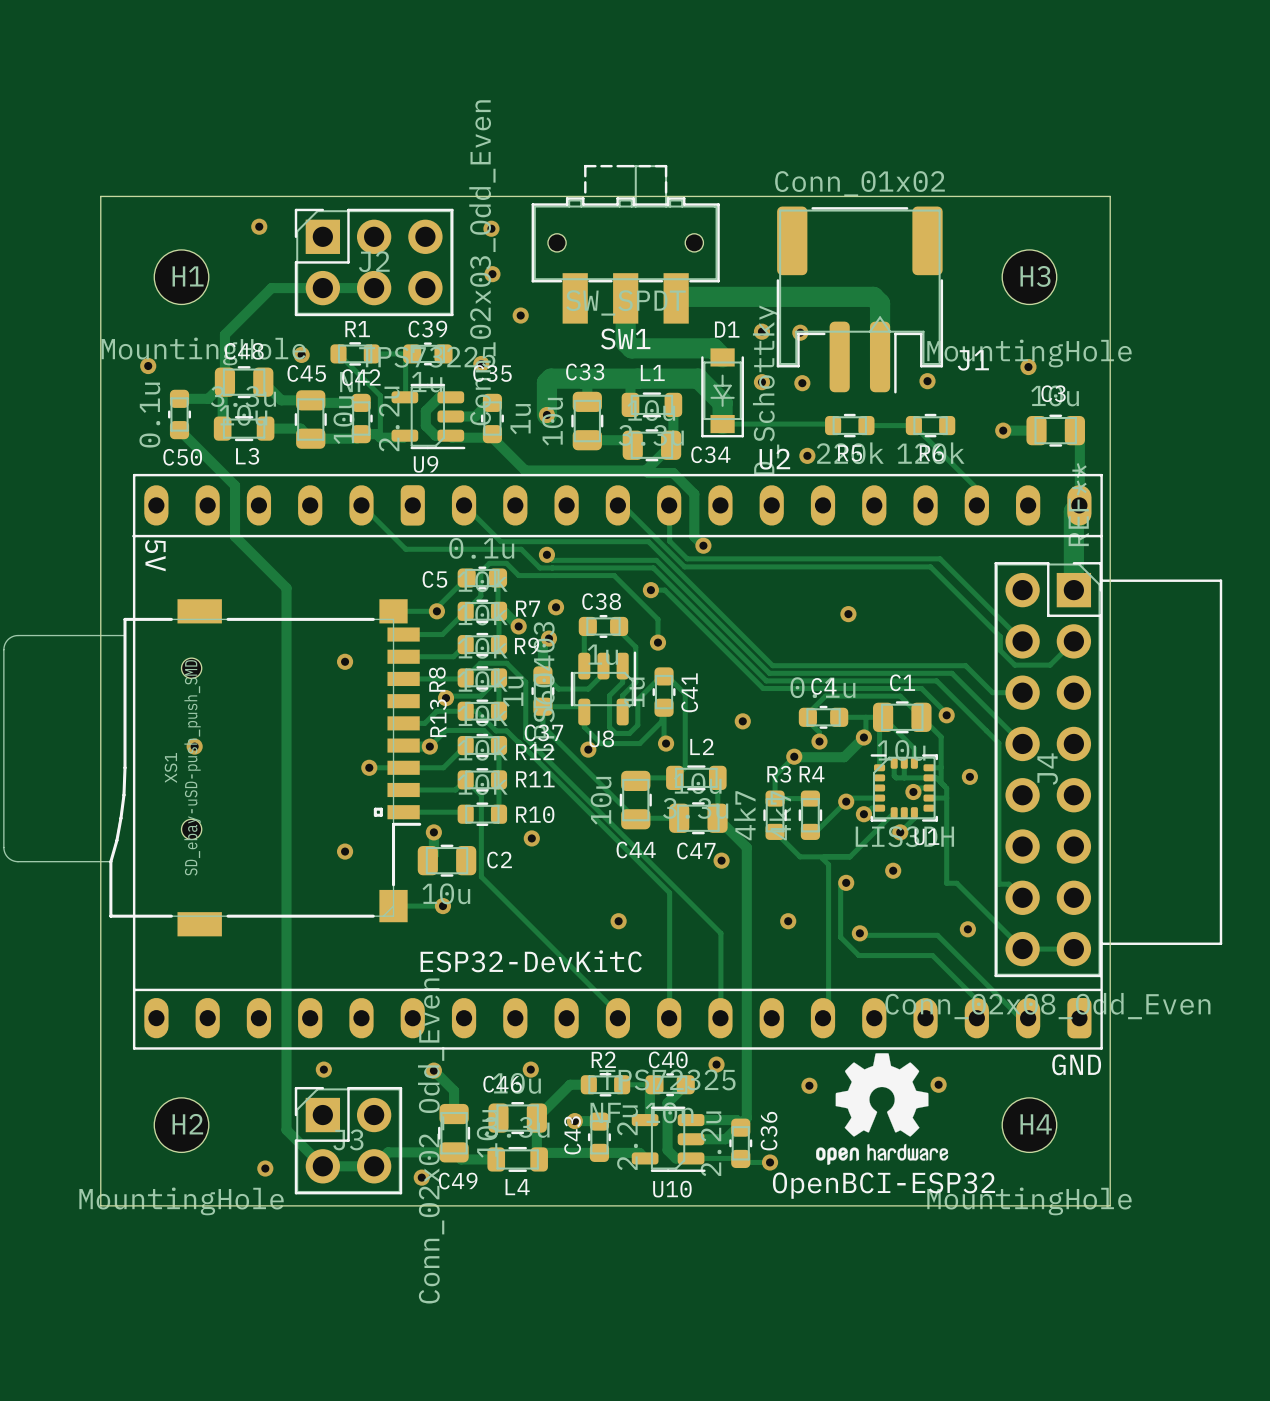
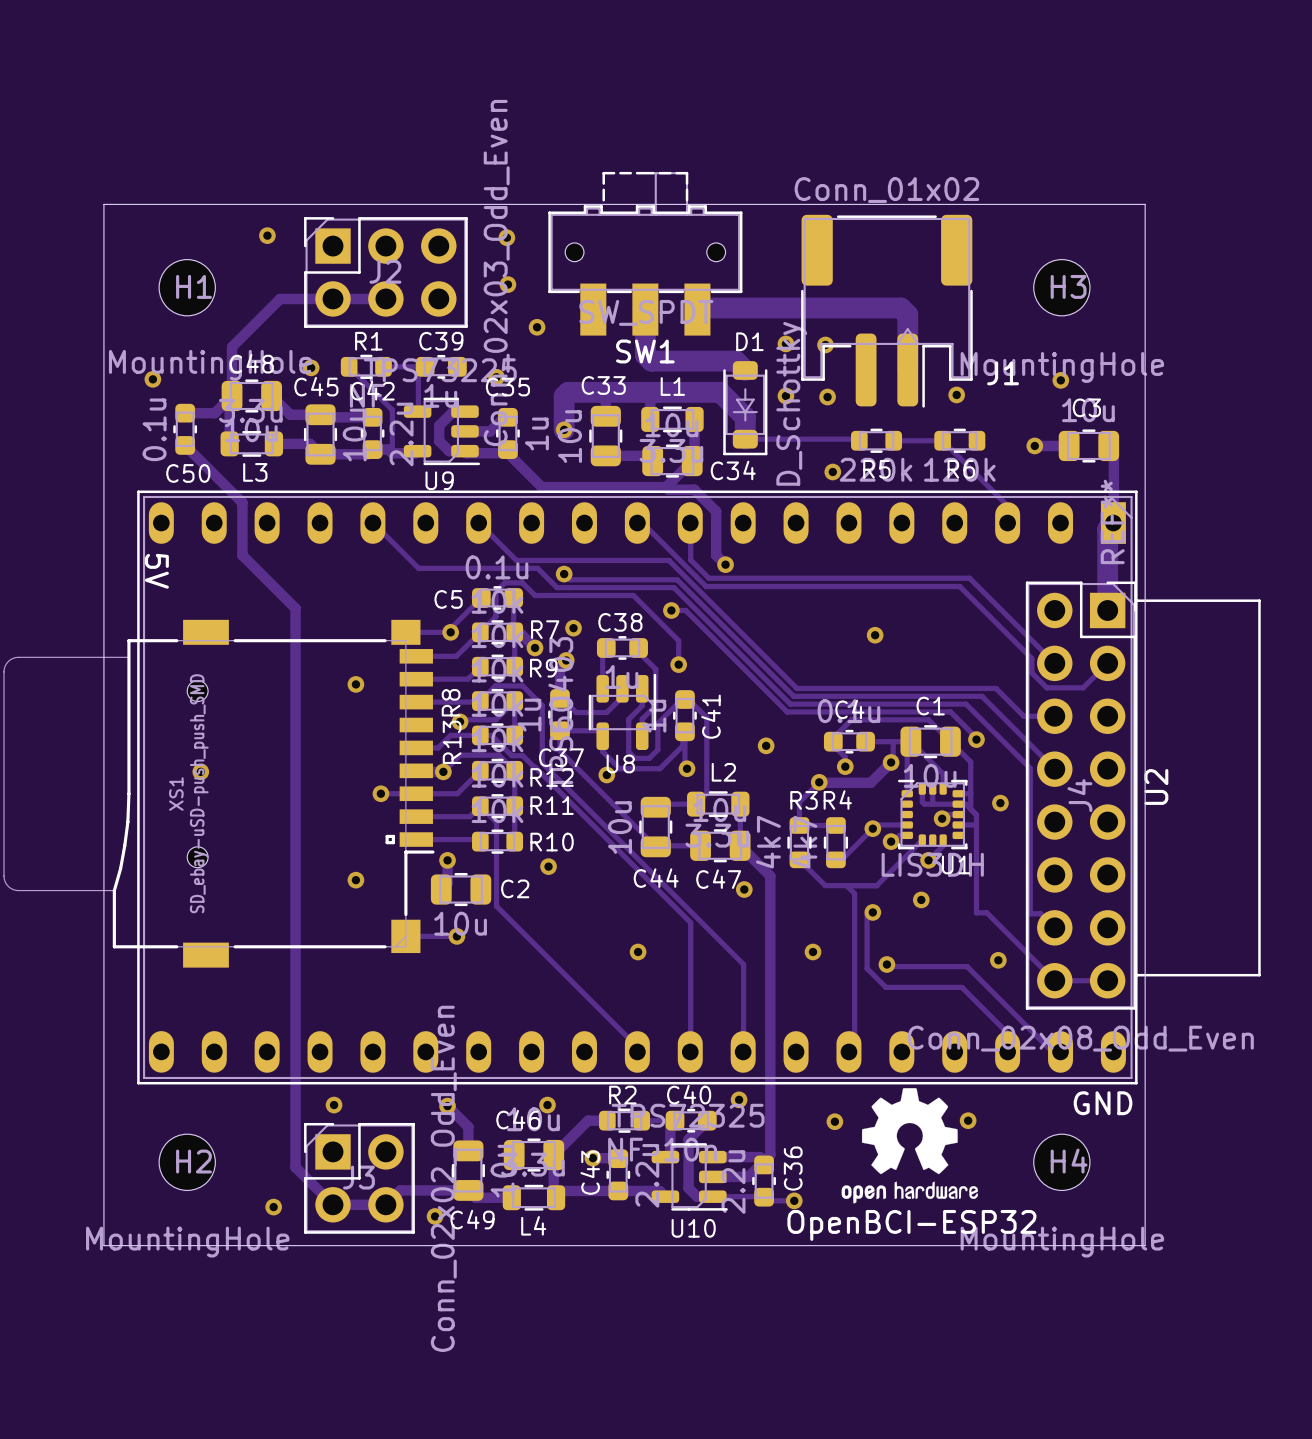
D1 footprint: [701, 348, 744, 438] -> [723, 361, 768, 456]
U2 name position: U2 (774, 459) -> U2 (1156, 786)
U2 footprint: [132, 473, 1223, 1050] -> [137, 490, 1261, 1085]
U2 value: ESP32-DevKitC (531, 961) -> none

